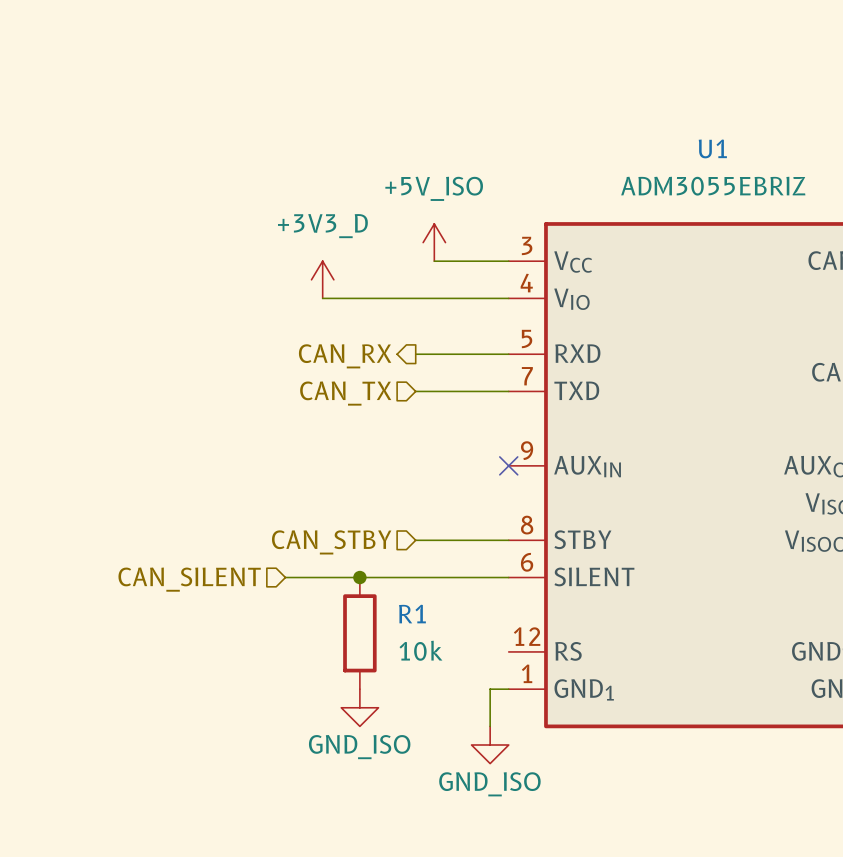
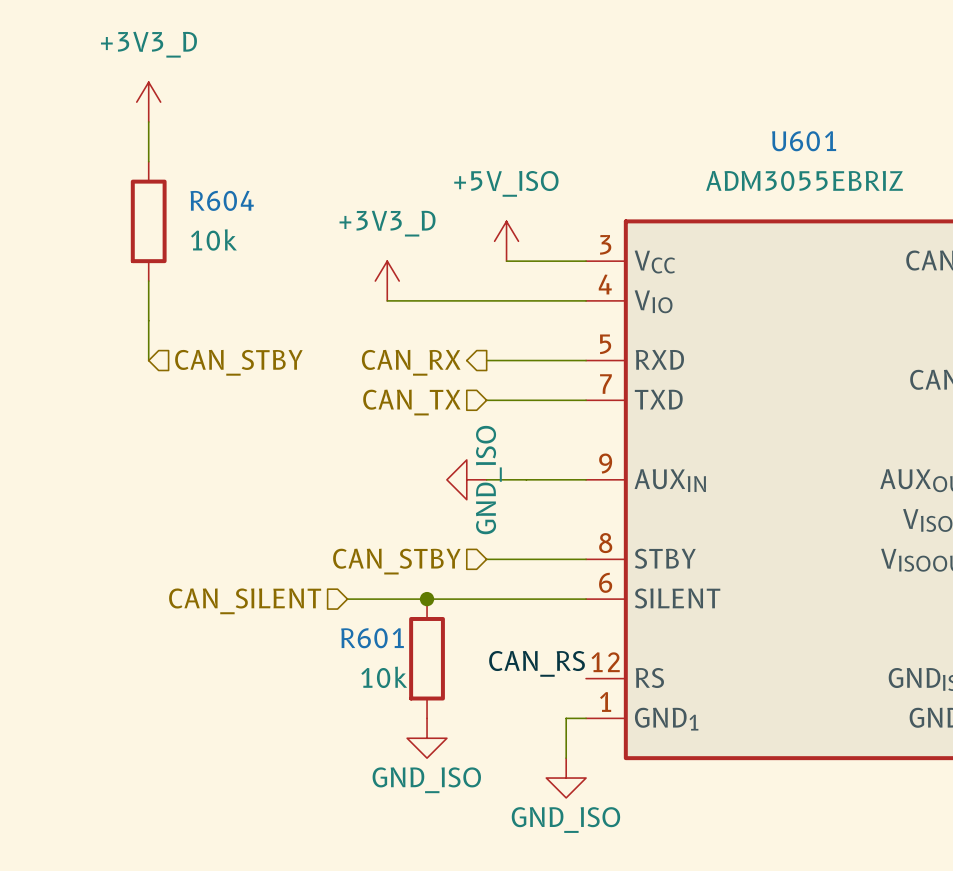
power symbol: none -> +3V3_D (148, 102)
wire: none -> (148, 121) (148, 161)
U1 name: U1 (712, 148) -> U601 (804, 141)
R604: none -> 10k (148, 221)
wire: none -> (148, 281) (148, 360)
hierarchical label: none -> CAN_STBY (238, 362)
power symbol: none -> GND_ISO (466, 479)
wire: none -> (486, 479) (586, 479)
no-connect mark: (508, 465) -> none
R1 name: R1 (412, 614) -> R601 (372, 638)
label: none -> CAN_RS (537, 663)
R1 value position: 10k (420, 650) -> 10k (384, 677)

